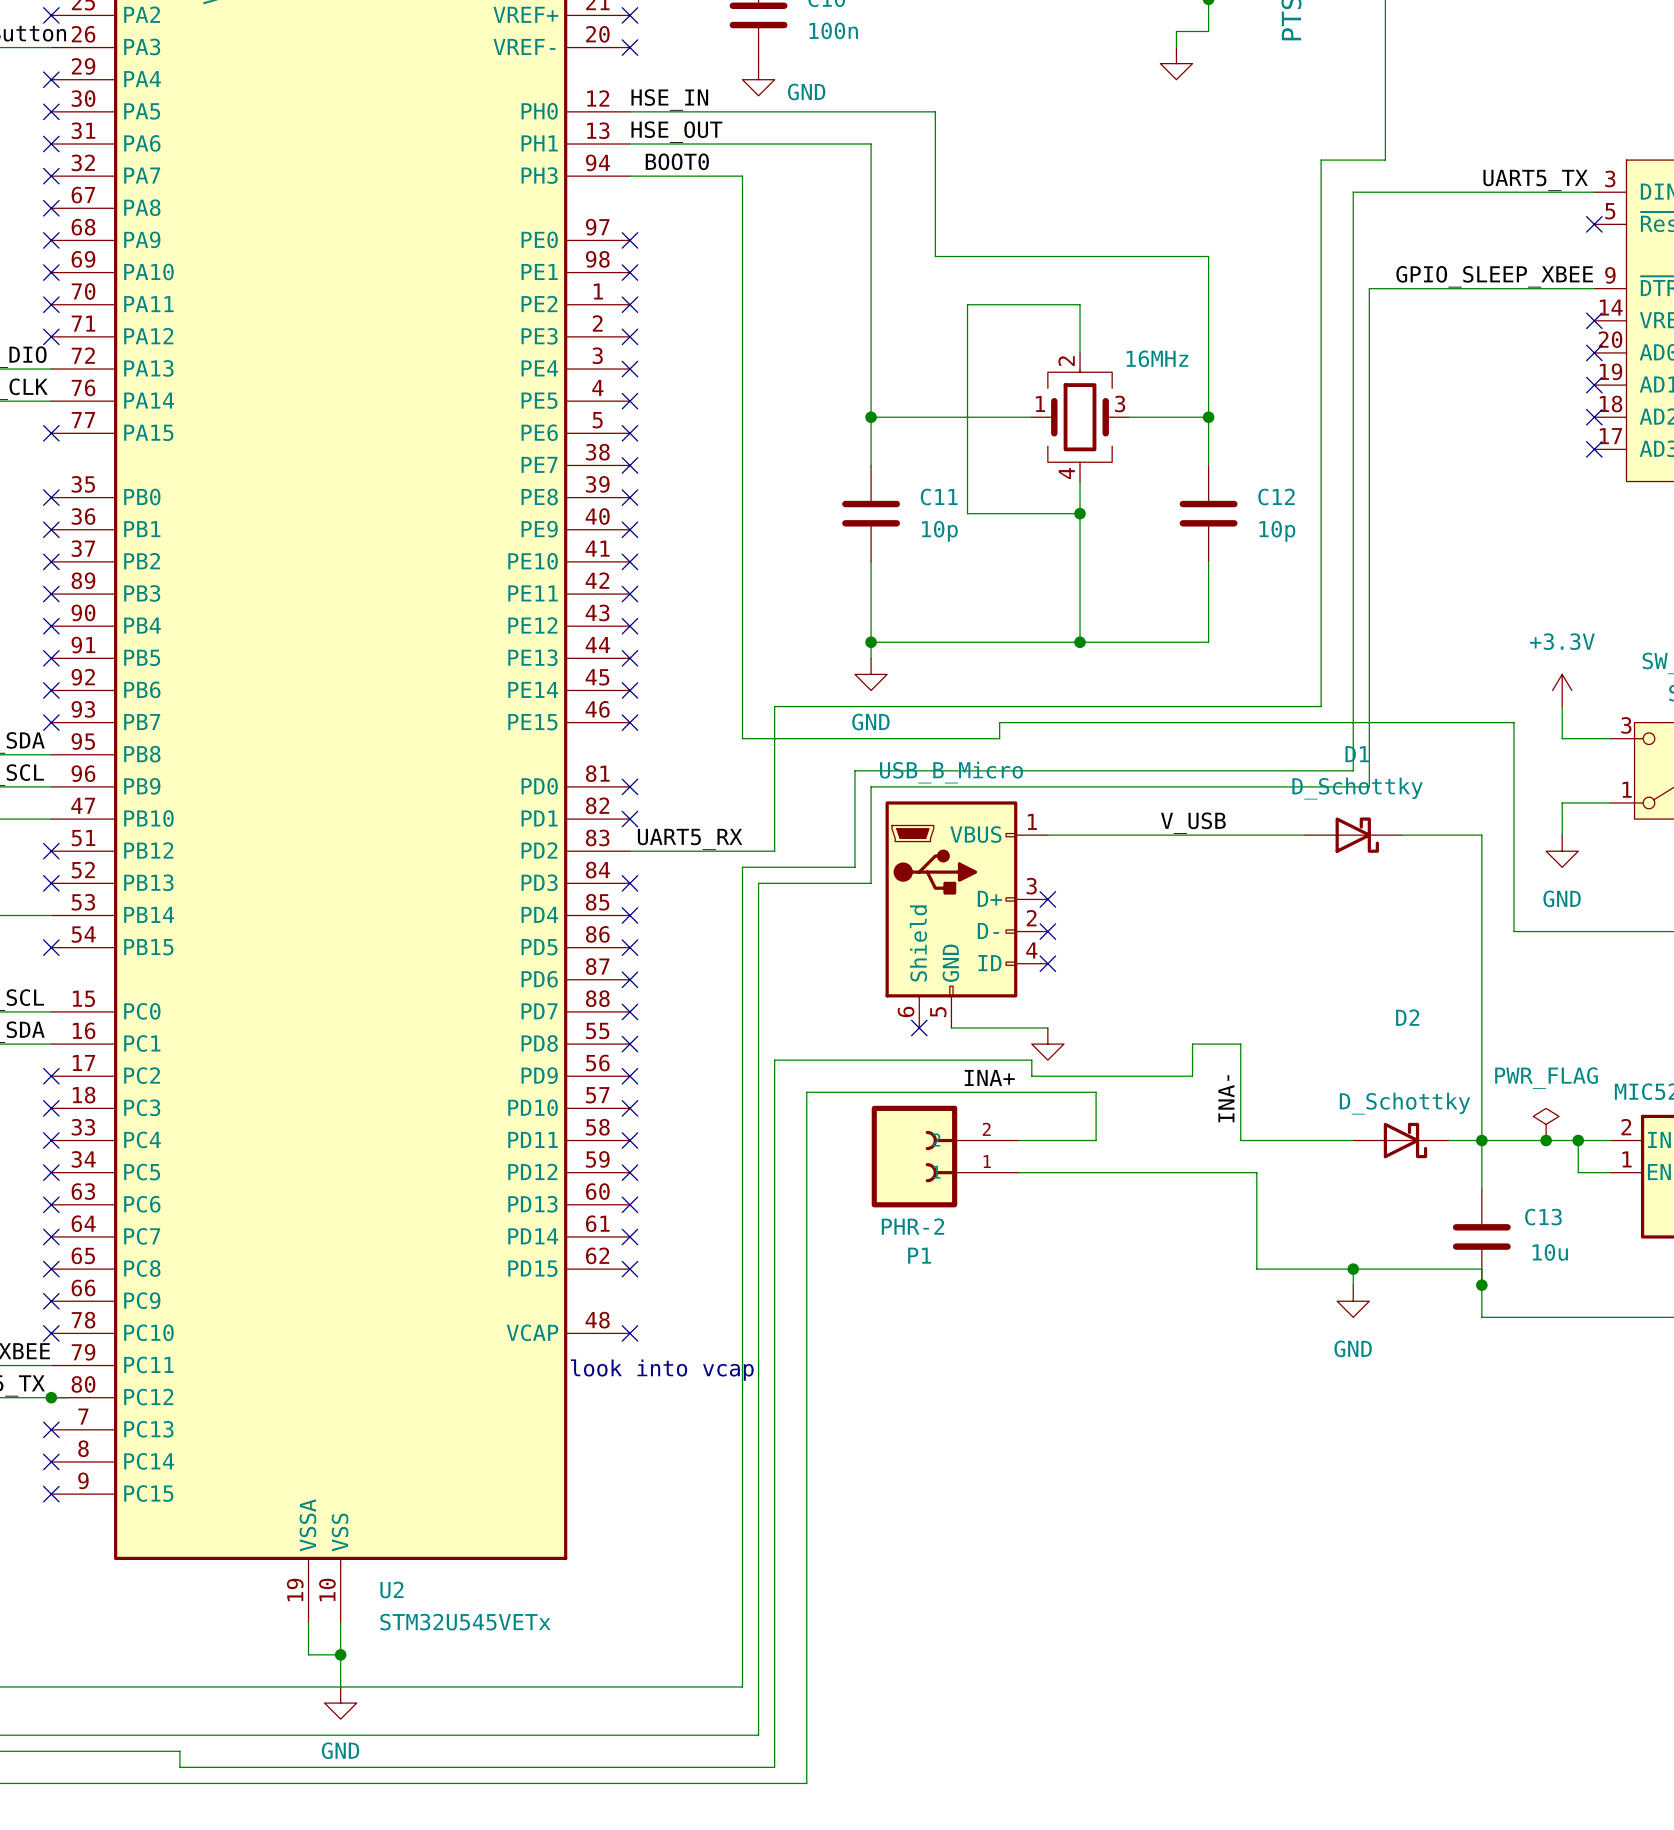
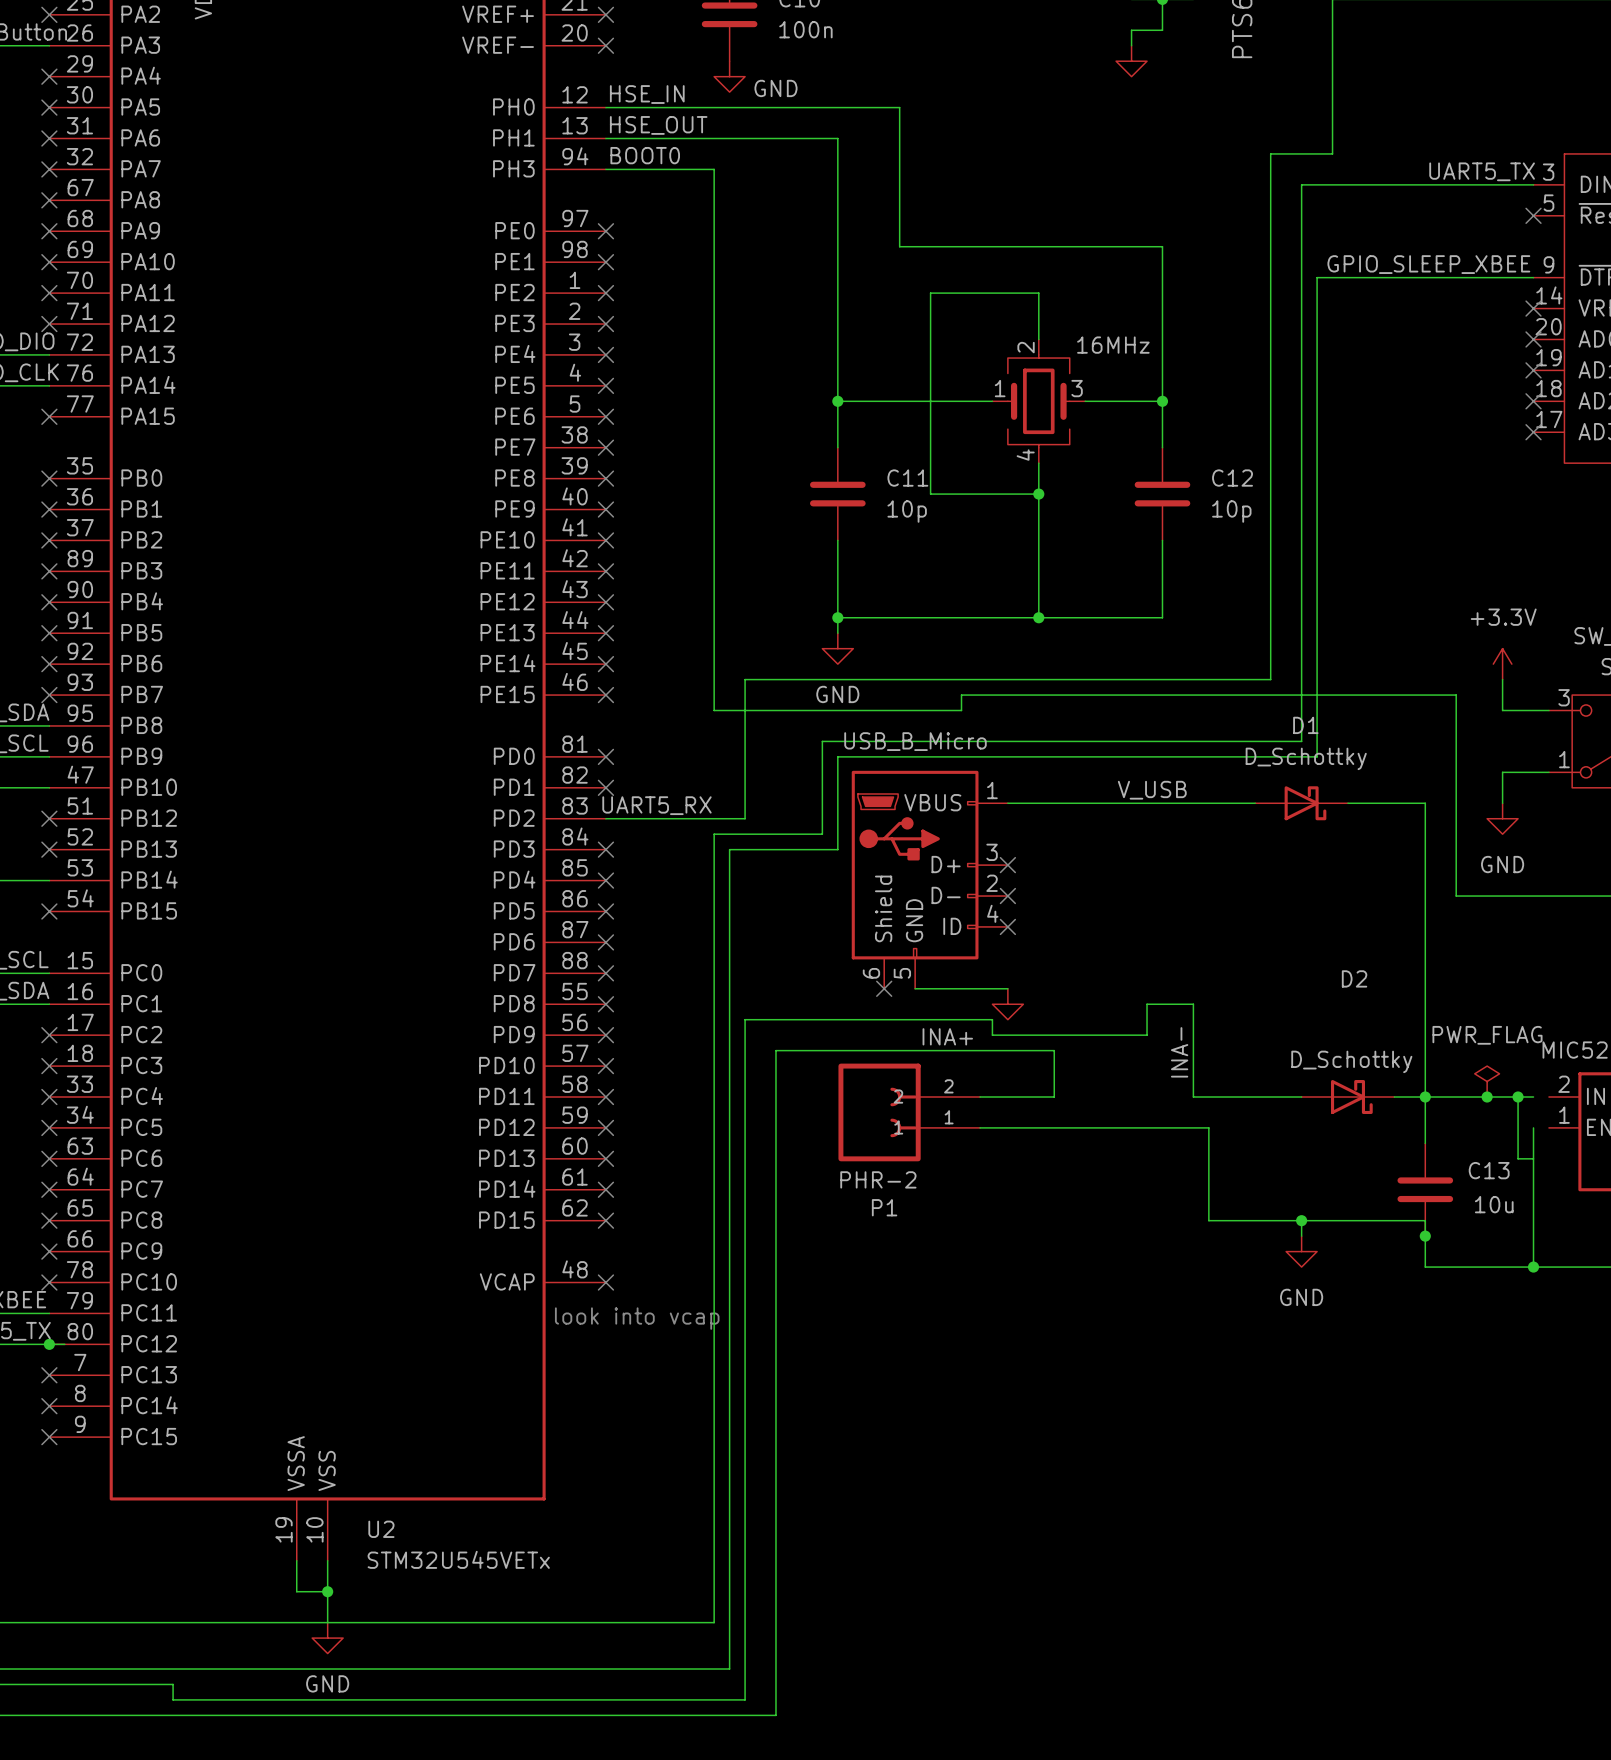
wire: (1594, 1140) (1610, 1140) -> none
wire: (1578, 1172) (1610, 1172) -> (1518, 1127) (1518, 1158) (1533, 1158)
wire: none -> (1533, 1127) (1533, 1267)
junction: none -> (1533, 1267)

